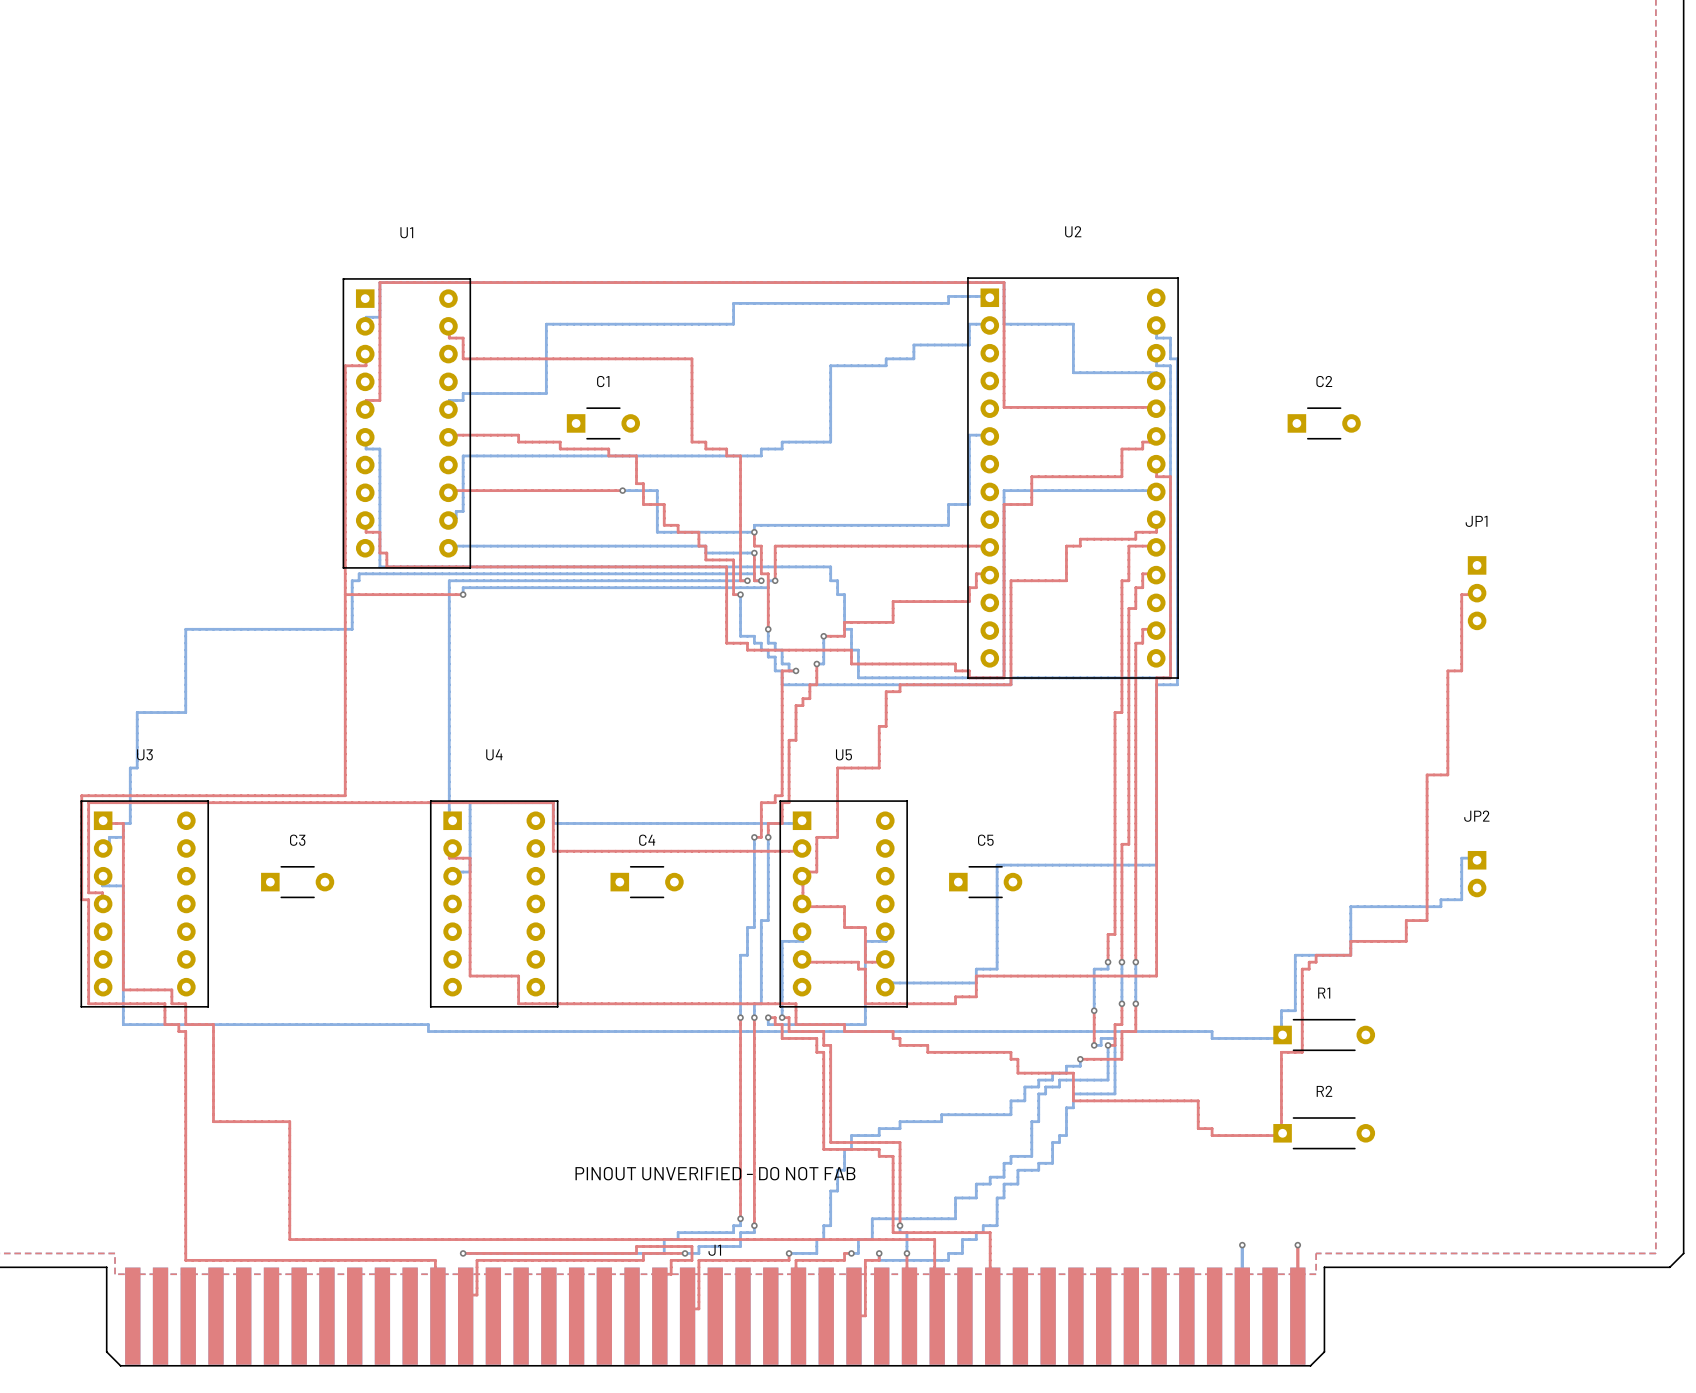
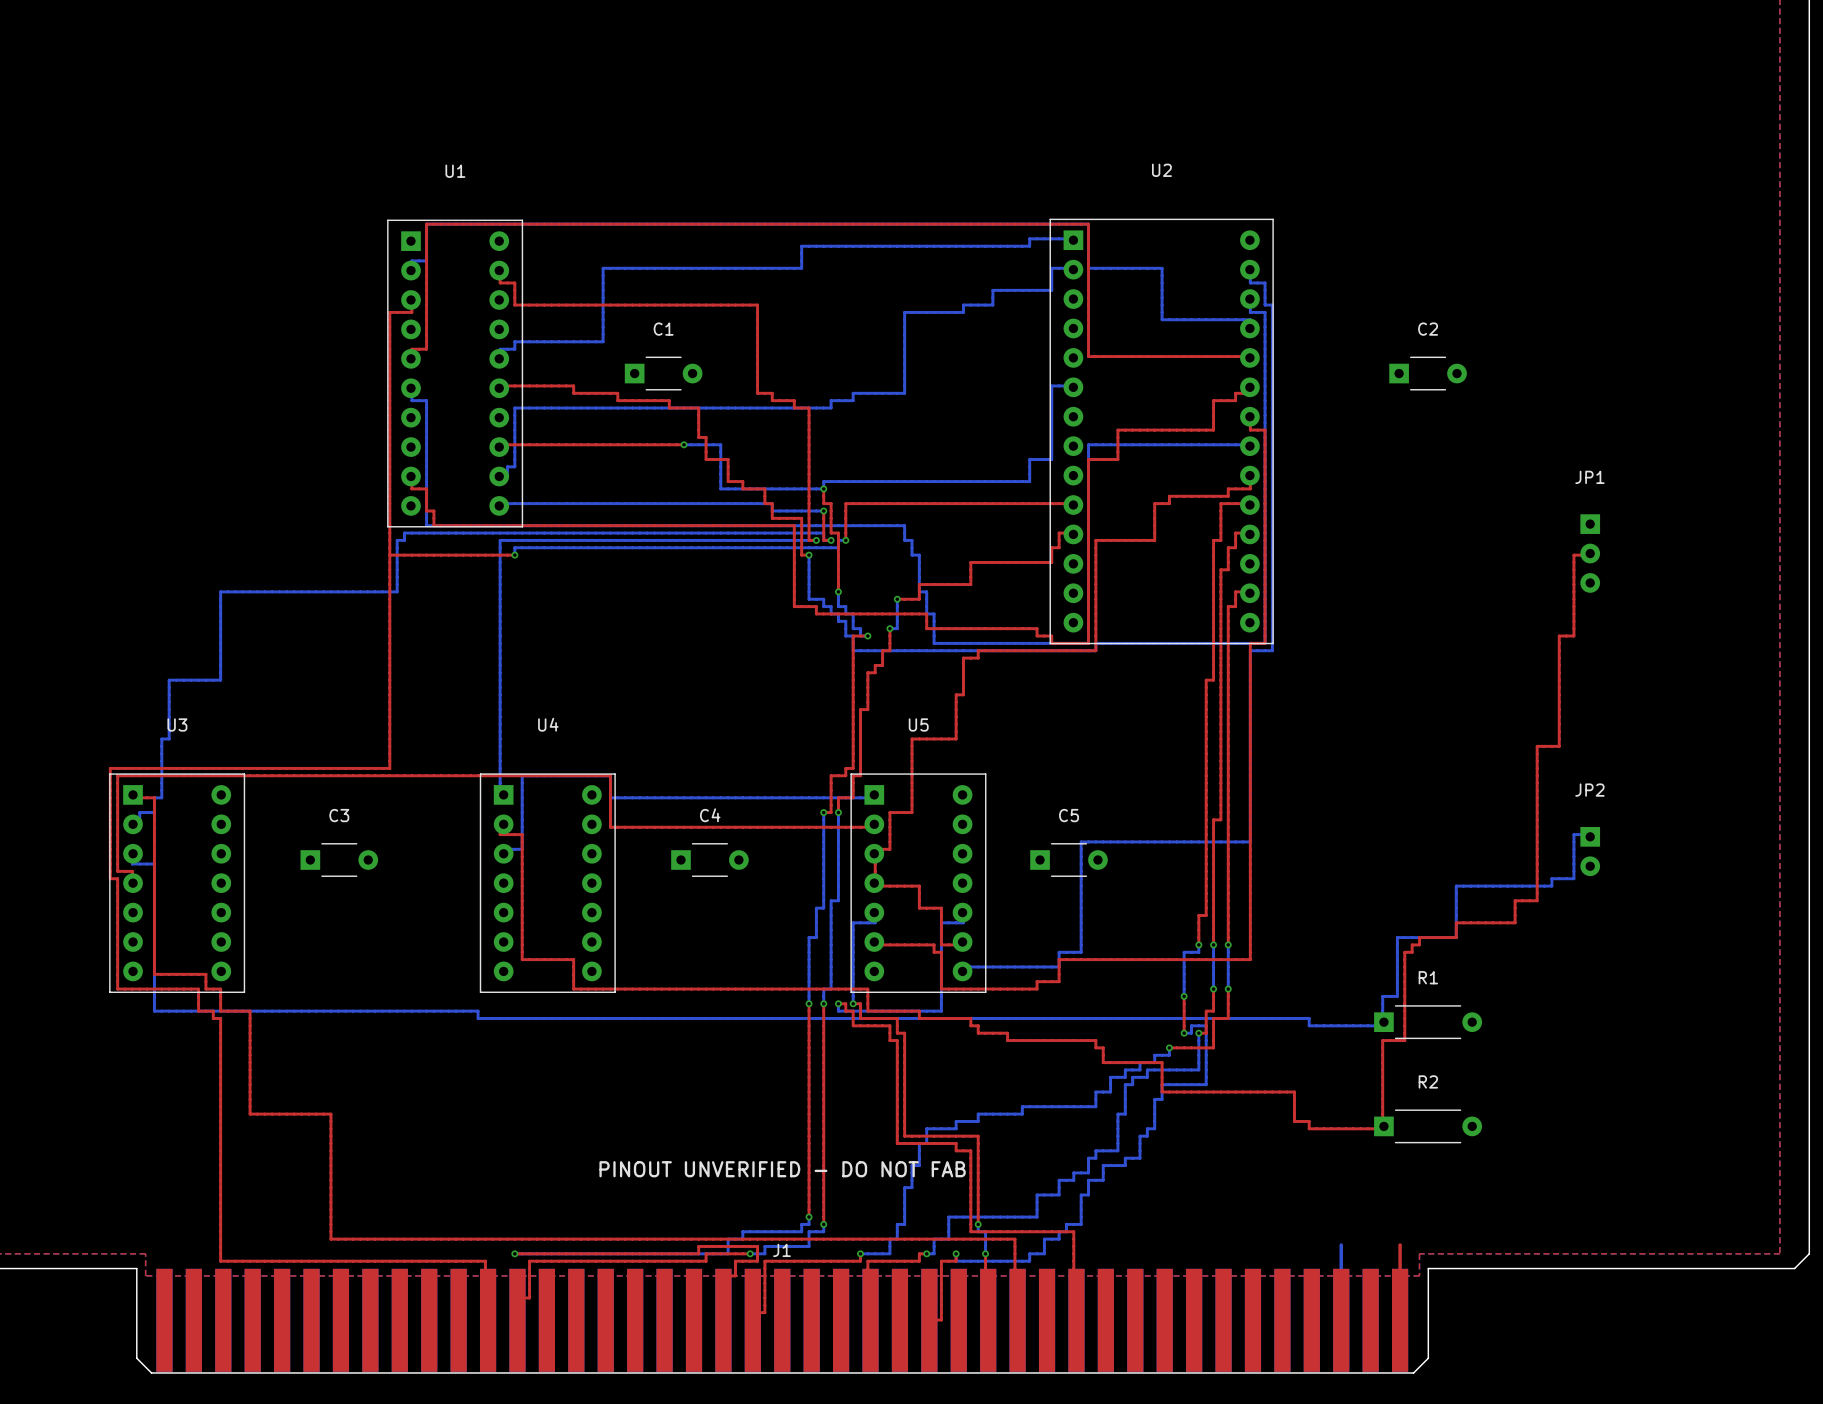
via: (1242, 1245) -> none
via: (1297, 1245) -> none

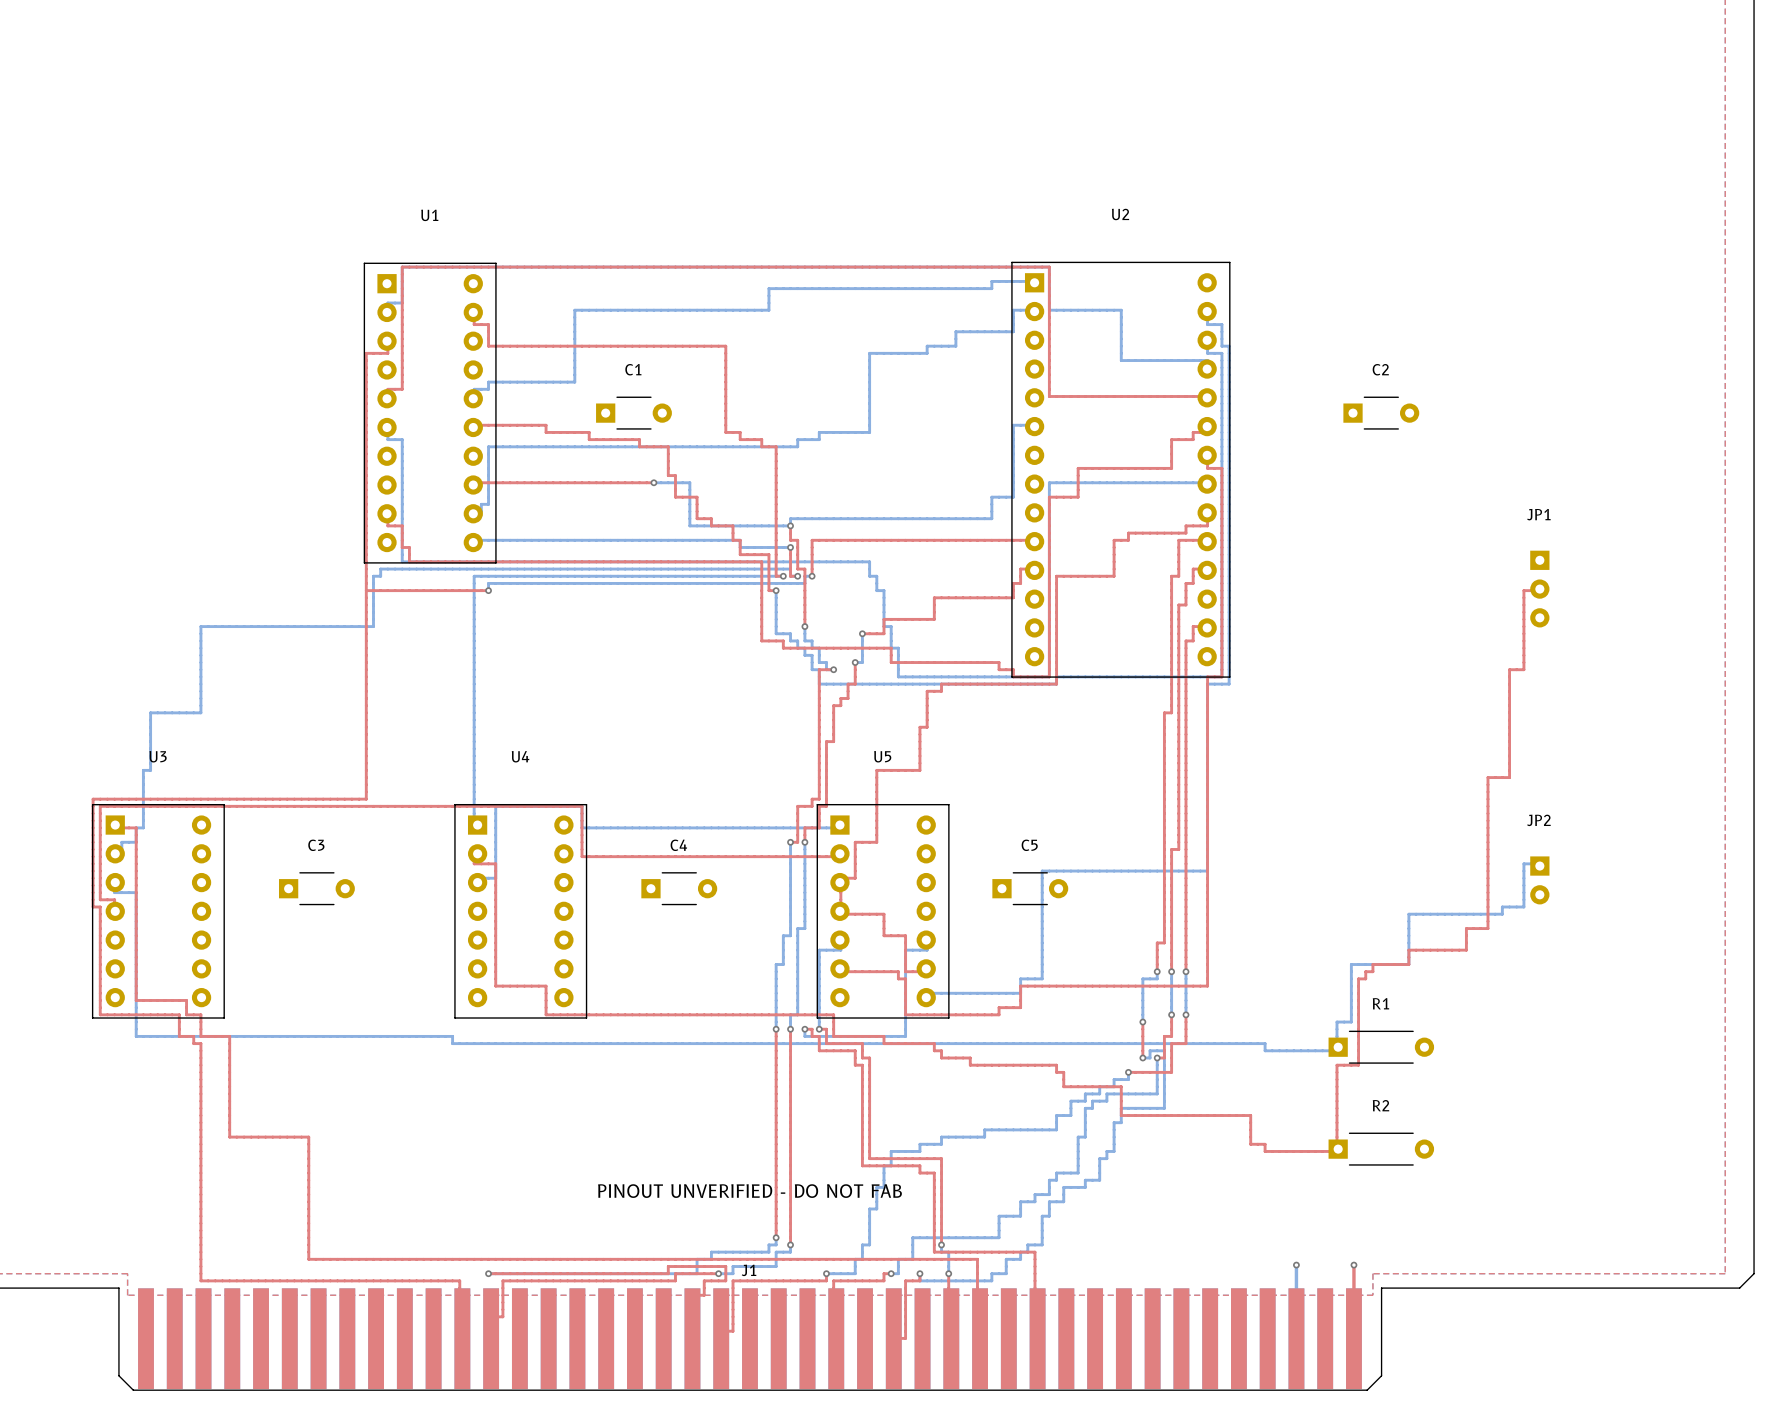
via: none -> (1296, 1265)
via: none -> (1353, 1265)

